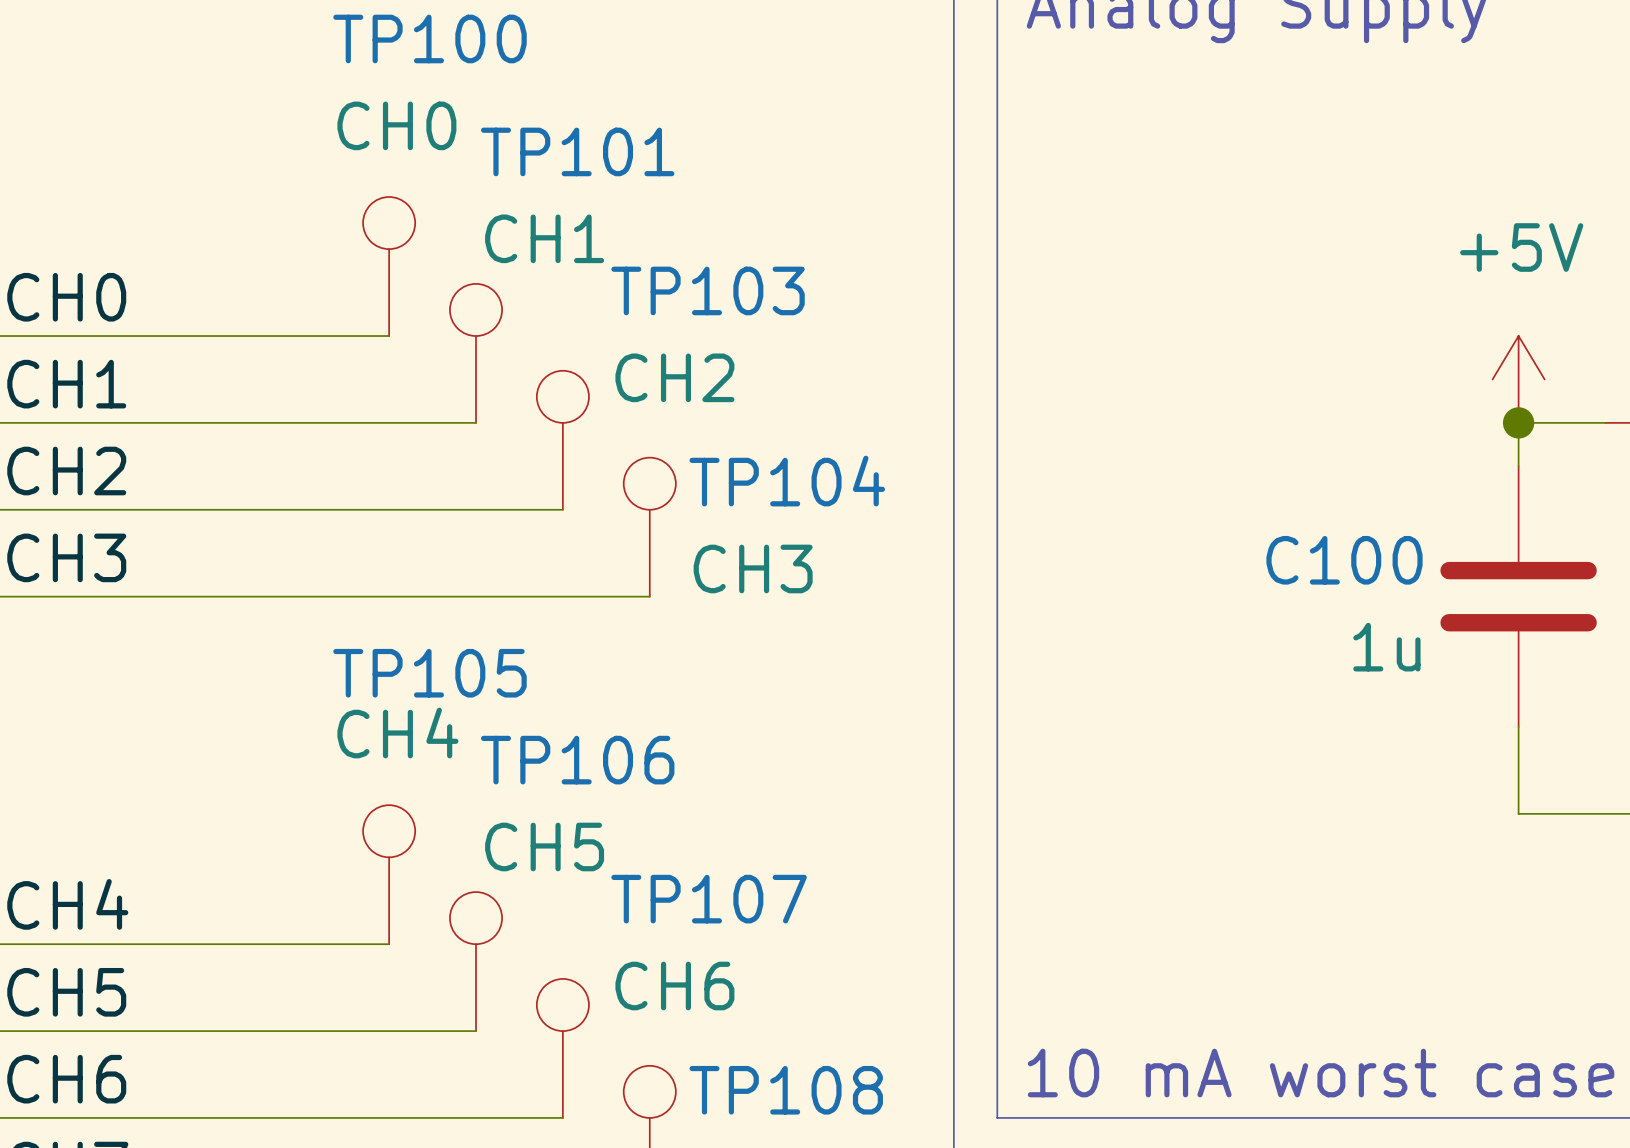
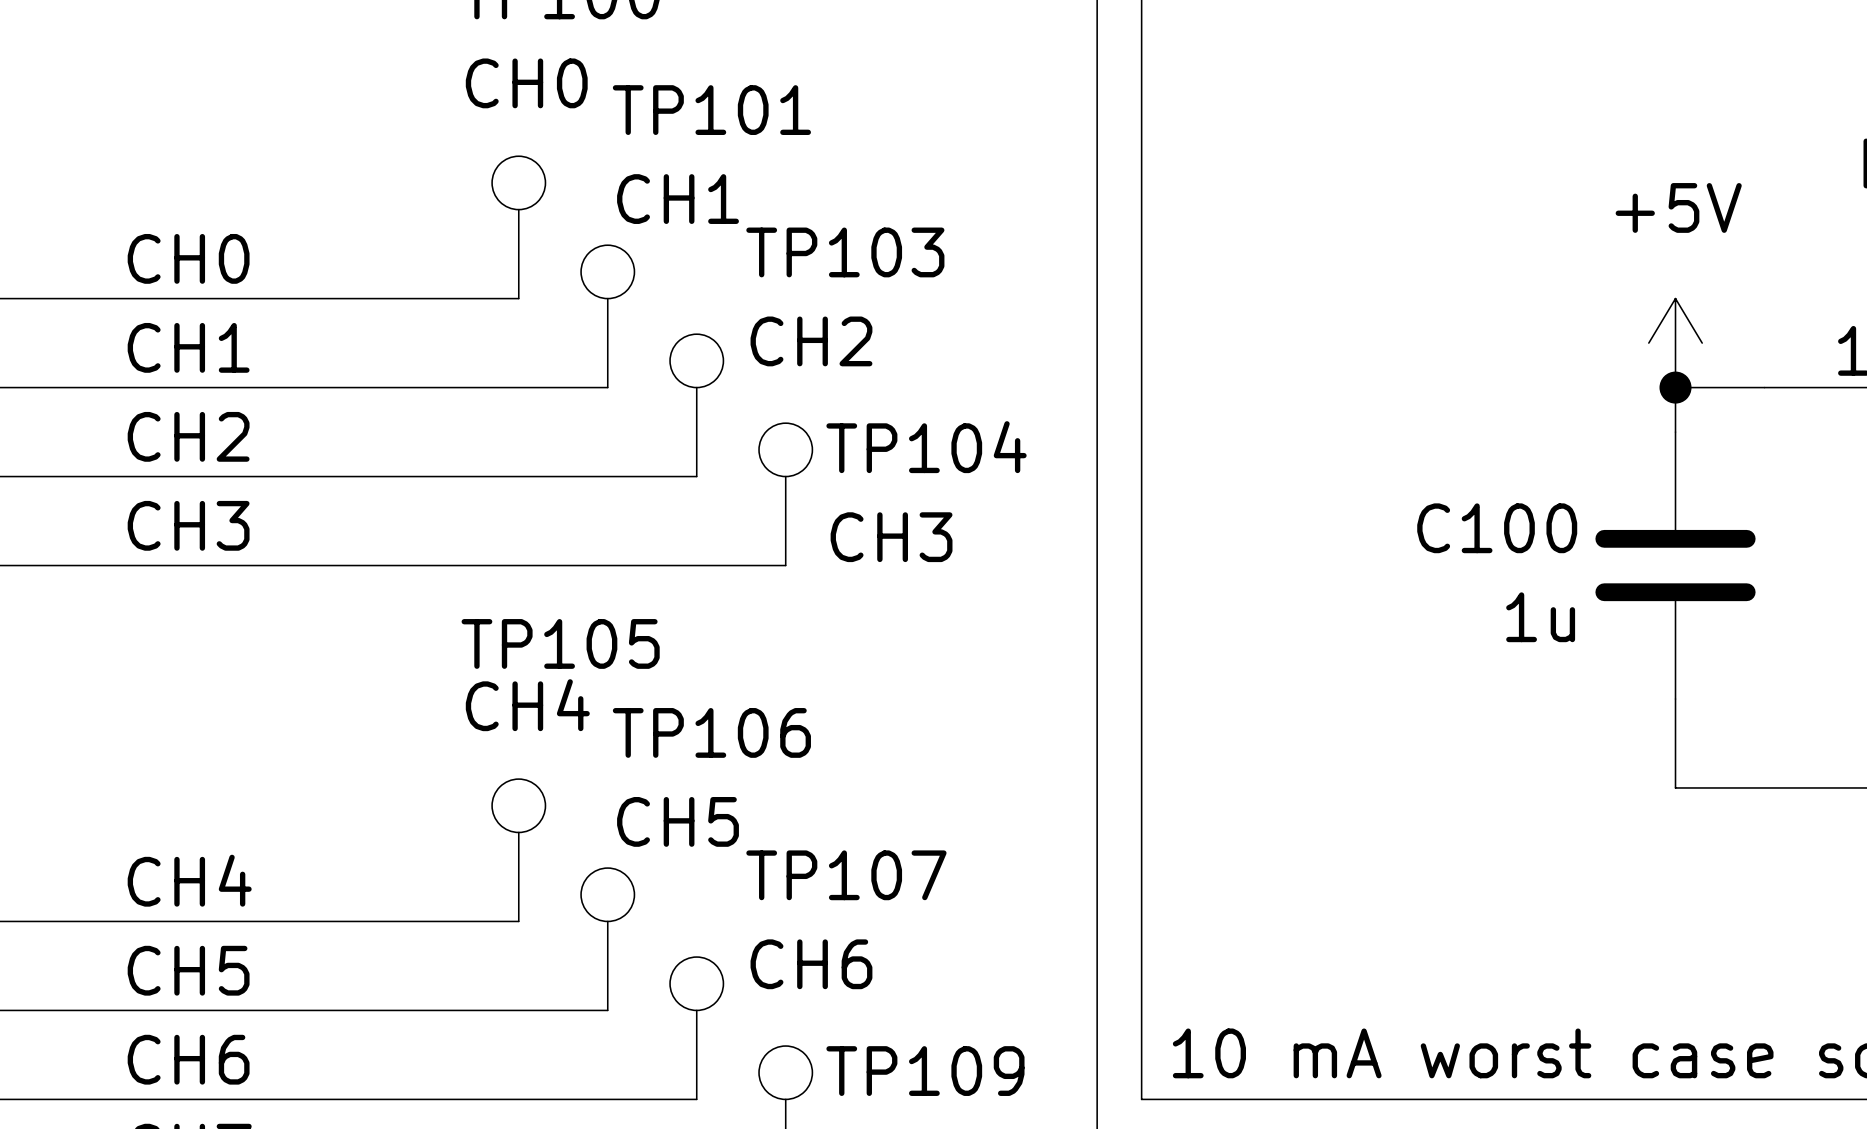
TP108 name: TP108 (786, 1090) -> TP109 (925, 1071)

